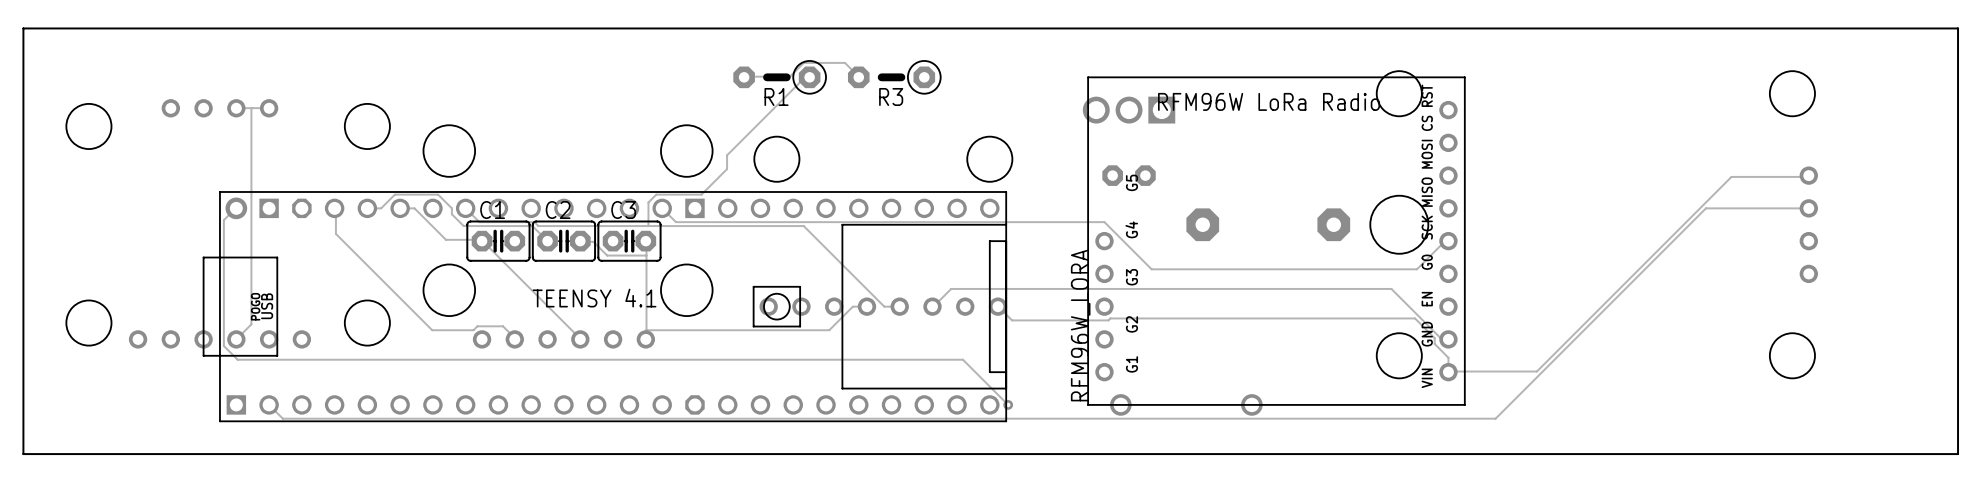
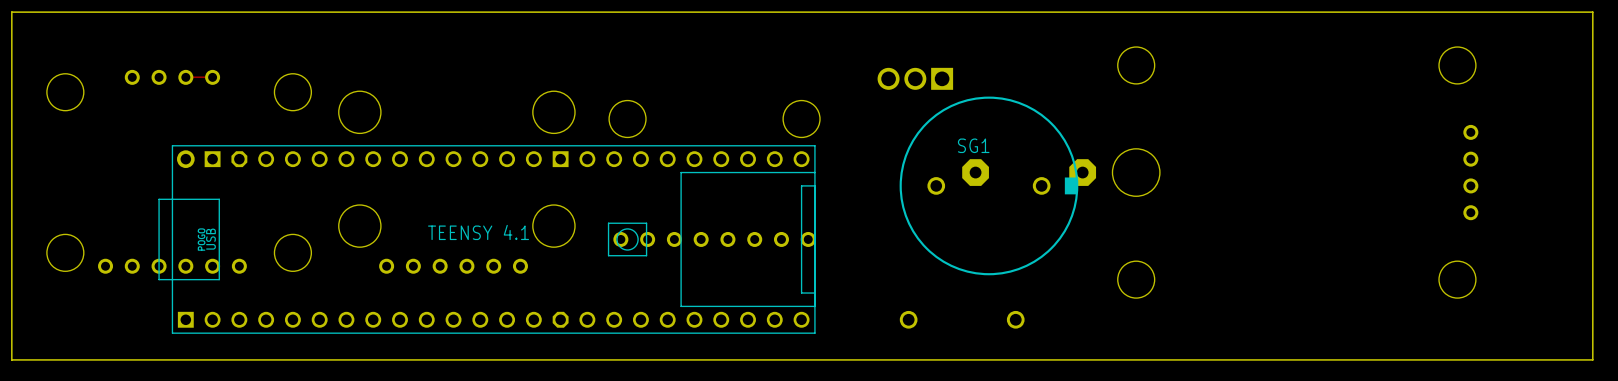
track: (744, 77) (789, 76) (803, 62) (845, 62) (858, 77) -> none
R1: (779, 77) -> none
track: (809, 77) (803, 78) (727, 155) (727, 169) (701, 194) (656, 194) (648, 202) (648, 226) -> none
R3: (894, 77) -> none
track: (251, 108) (251, 324) (236, 339) -> none
part: (1129, 175) -> none
track: (1808, 175) (1731, 176) (1536, 371) (1448, 371) -> none
track: (236, 208) (223, 220) (223, 345) (237, 359) (962, 359) (1008, 404) -> none
track: (334, 208) (335, 233) (432, 330) (473, 330) (477, 326) (503, 326) (514, 339) -> none
track: (367, 208) (381, 208) (394, 194) (438, 194) (451, 208) (451, 214) (463, 226) (532, 226) (547, 241) -> none
track: (400, 208) (414, 208) (446, 239) (481, 239) (580, 339) -> none
track: (465, 208) (479, 222) (534, 222) (538, 226) (803, 226) (884, 306) (899, 306) -> none
track: (662, 208) (675, 222) (1104, 222) (1151, 269) (1417, 269) (1444, 241) (1448, 241) -> none
track: (1808, 208) (1705, 208) (1495, 418) (282, 418) (269, 404) -> none
C1: (498, 241) -> none
C2: (563, 241) -> none
track: (580, 241) (593, 241) (607, 255) (646, 255) -> none
C3: (629, 241) -> none
track: (645, 241) (645, 339) -> none
SG1: none -> (988, 185)
part: (1276, 241) -> none
track: (866, 306) (852, 306) (829, 330) (646, 330) -> none
track: (932, 306) (951, 288) (1391, 288) (1440, 338) (1448, 339) -> none
track: (998, 306) (1012, 320) (1415, 318) (1434, 338) (1434, 344) (1448, 357) (1448, 372) -> none
via: (1008, 404) -> none

